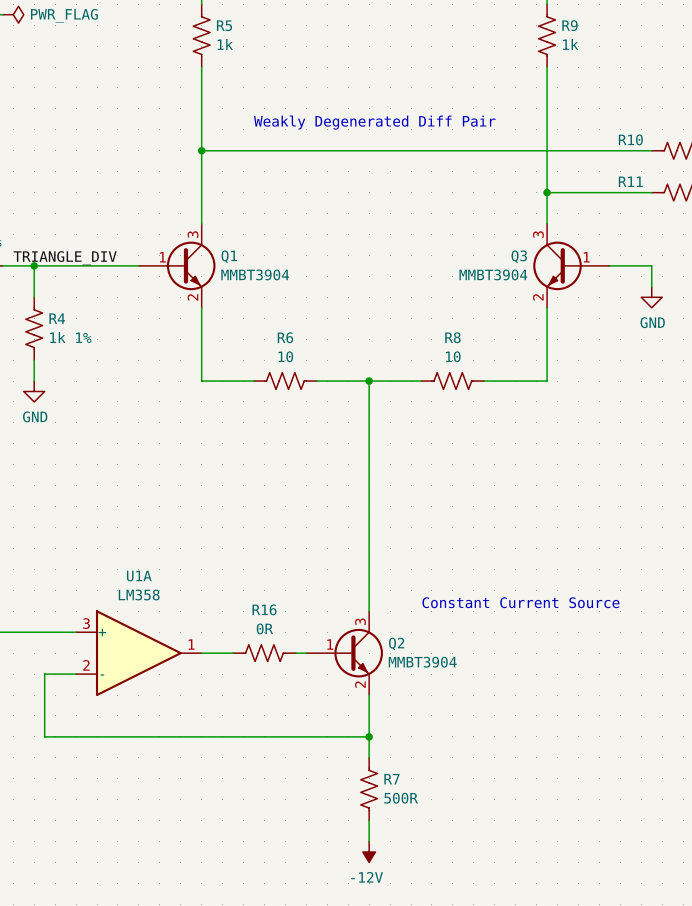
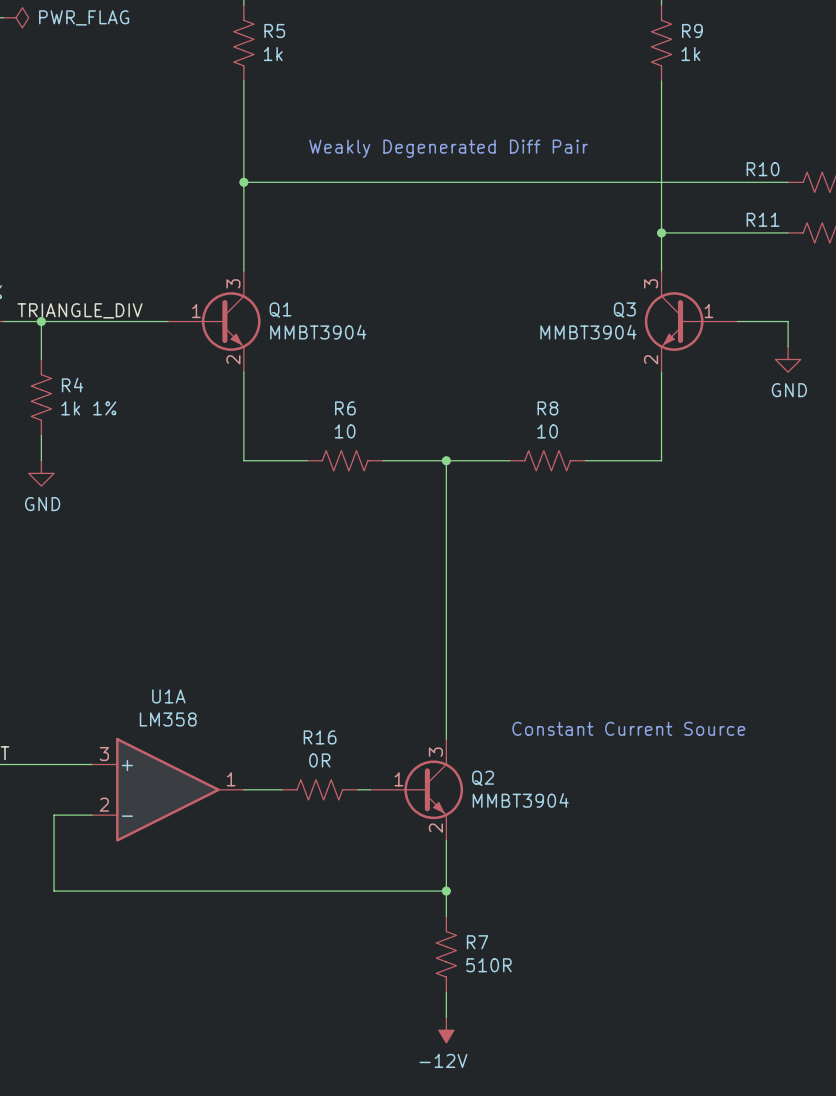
R7 value: 500R (401, 798) -> 510R (488, 965)

